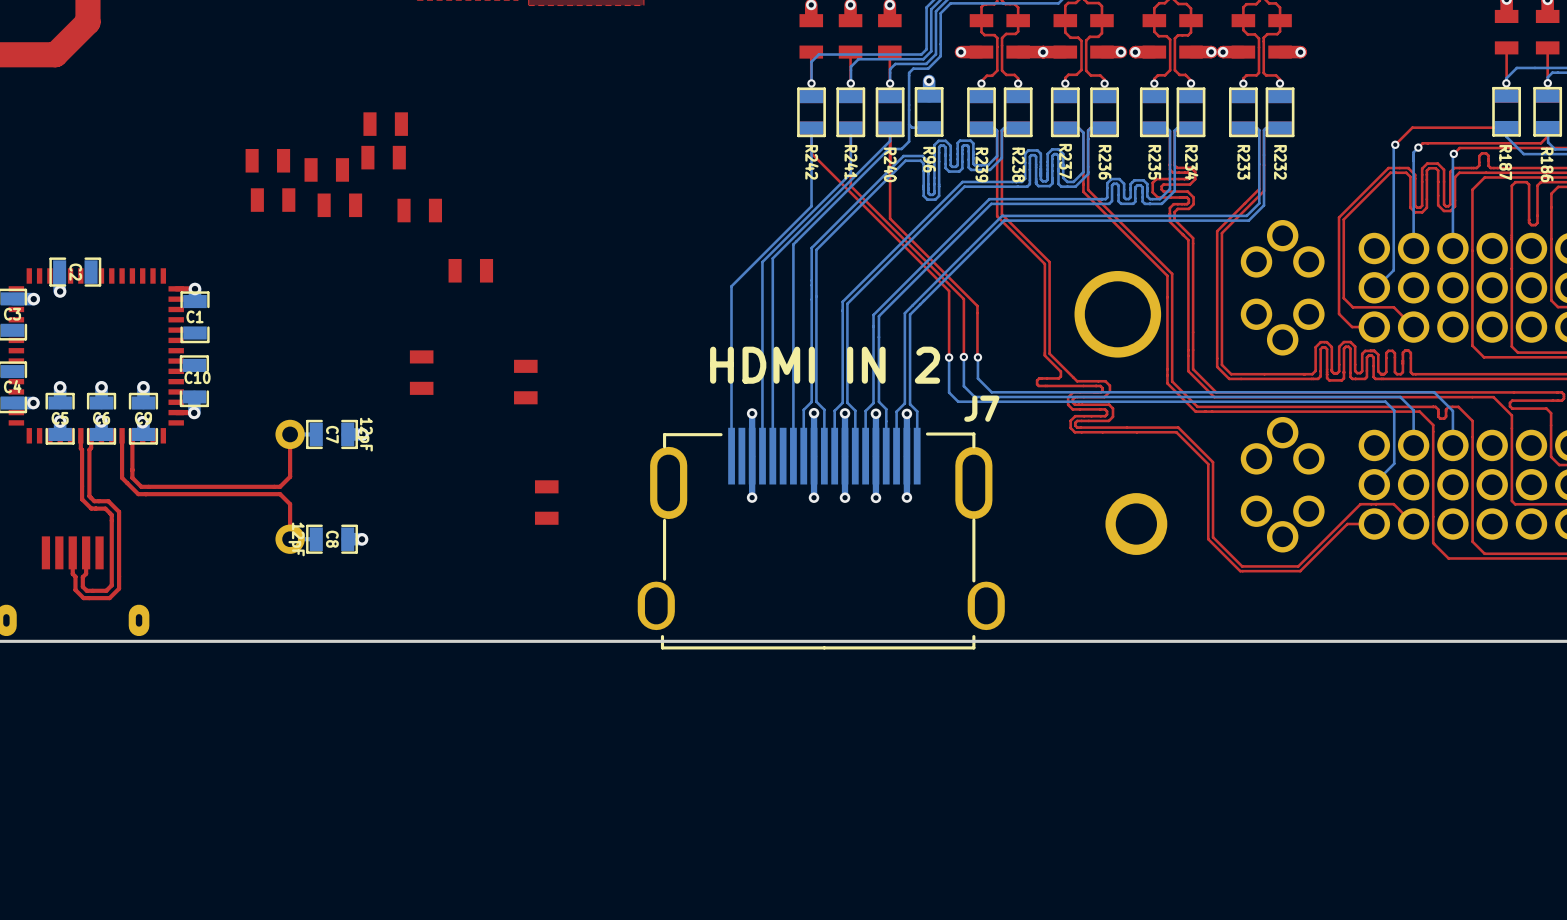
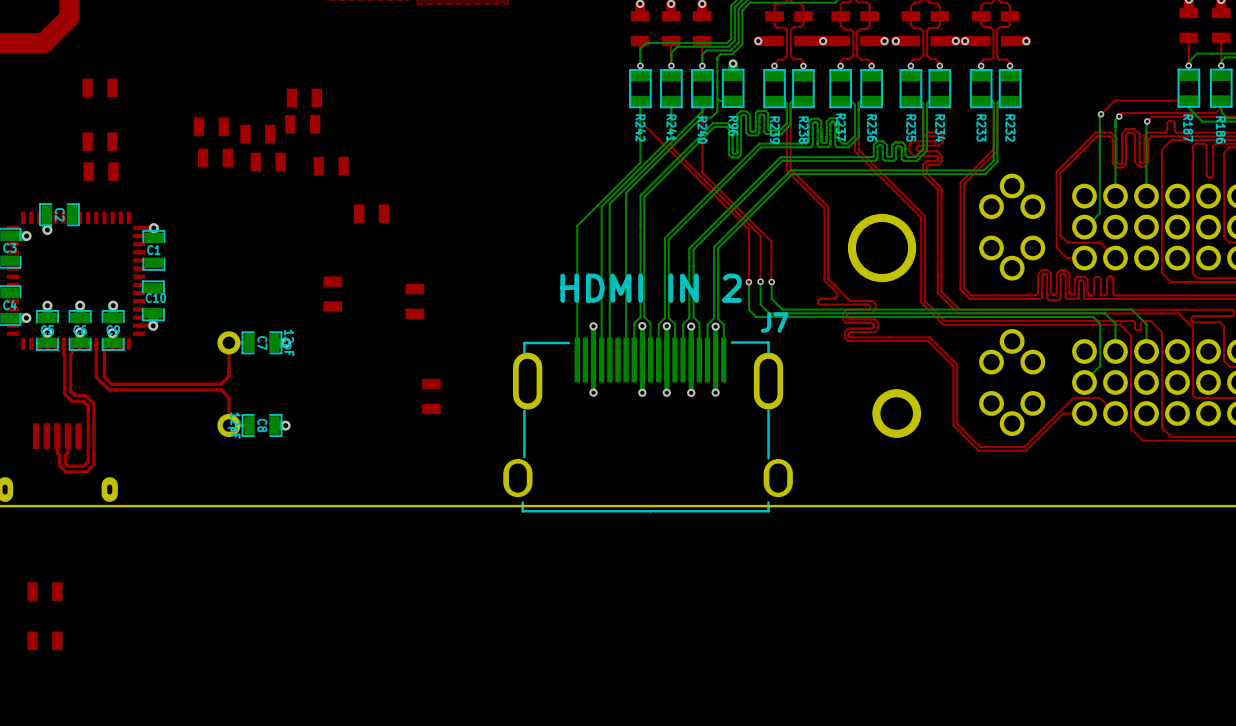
part: none -> (100, 87)
part: none -> (100, 141)
part: none -> (101, 171)
part: none -> (44, 591)
part: none -> (44, 640)

